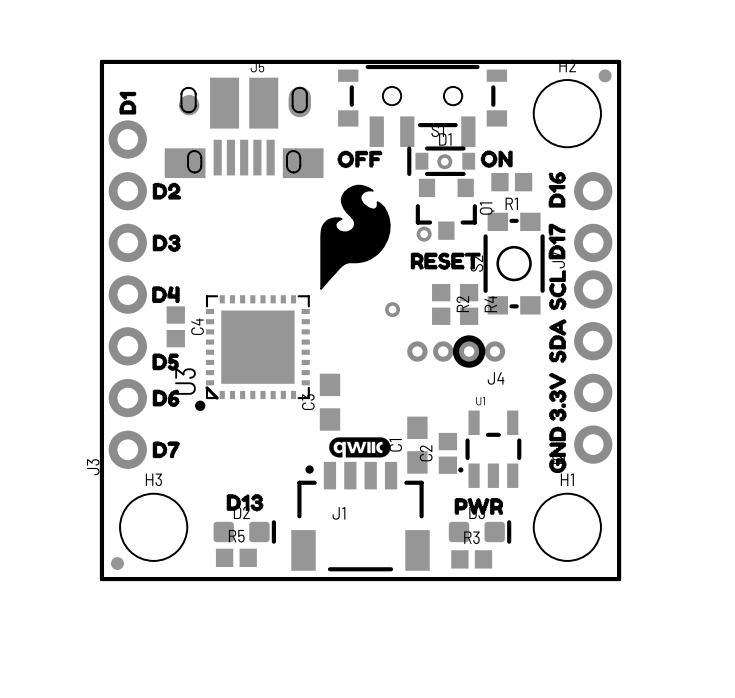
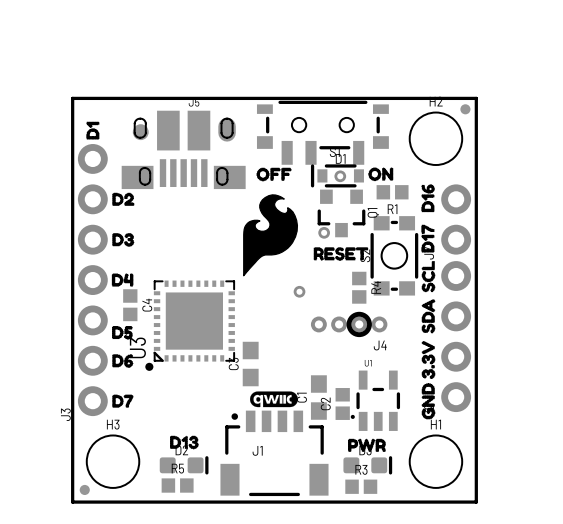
R2: (441, 304) -> none

